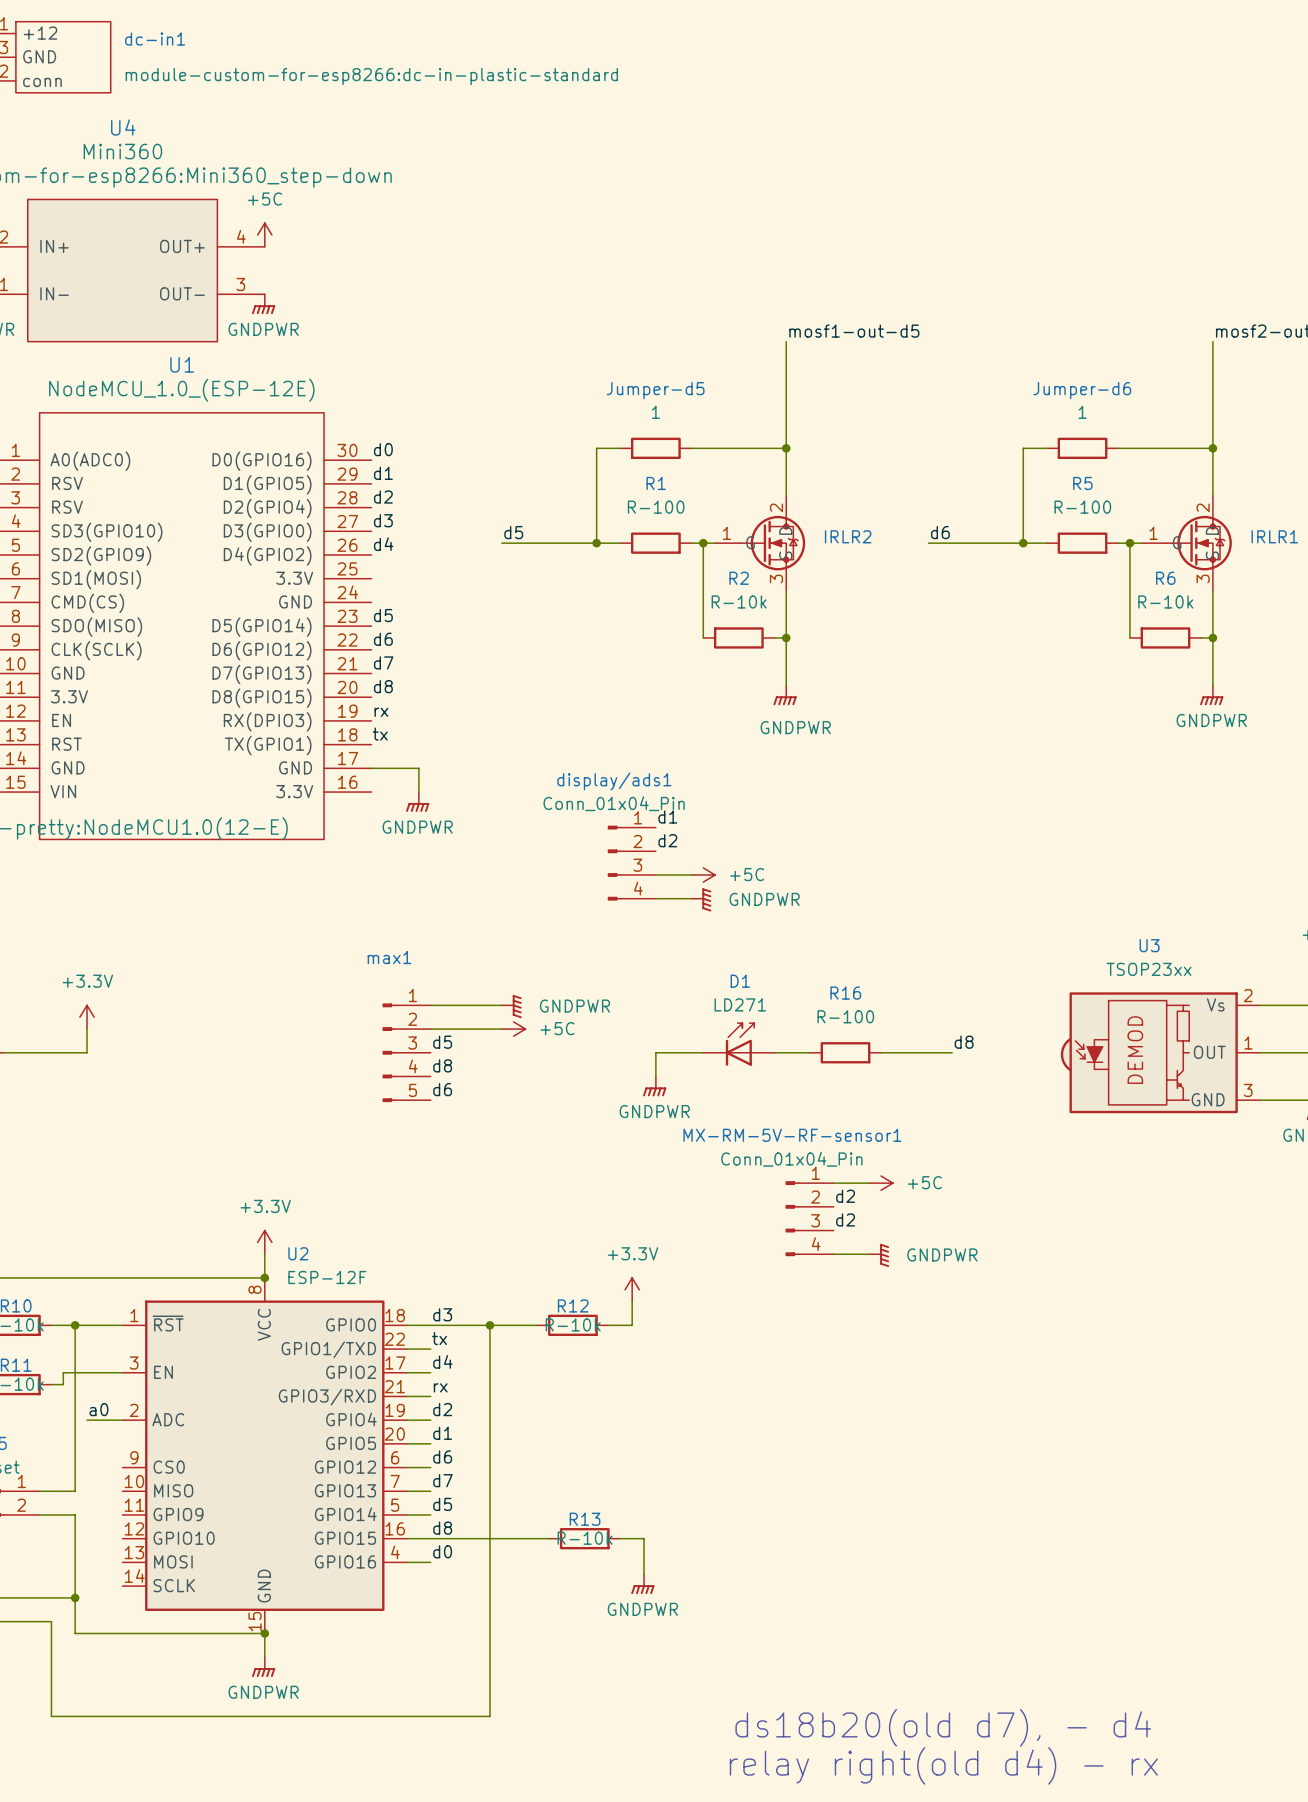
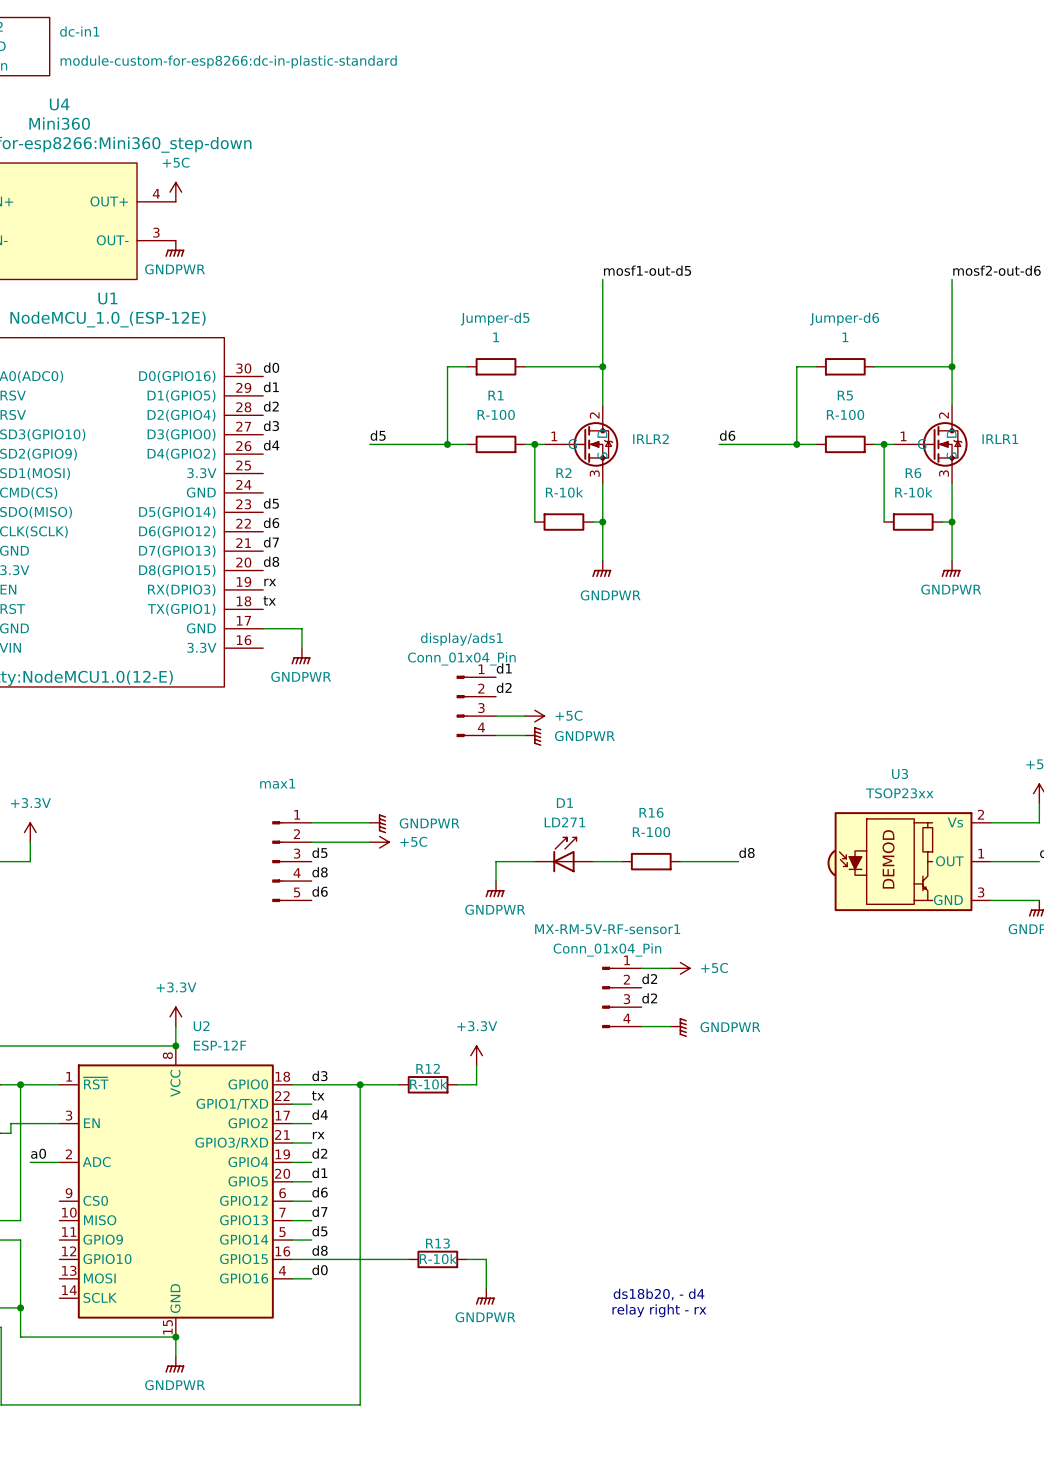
text: none -> ds18b20, - d4 (659, 1294)
text: none -> relay right - rx (659, 1310)
text: ds18b20(old d7), - d4 (943, 1727) -> none
text: relay right(old d4) - rx (943, 1765) -> none

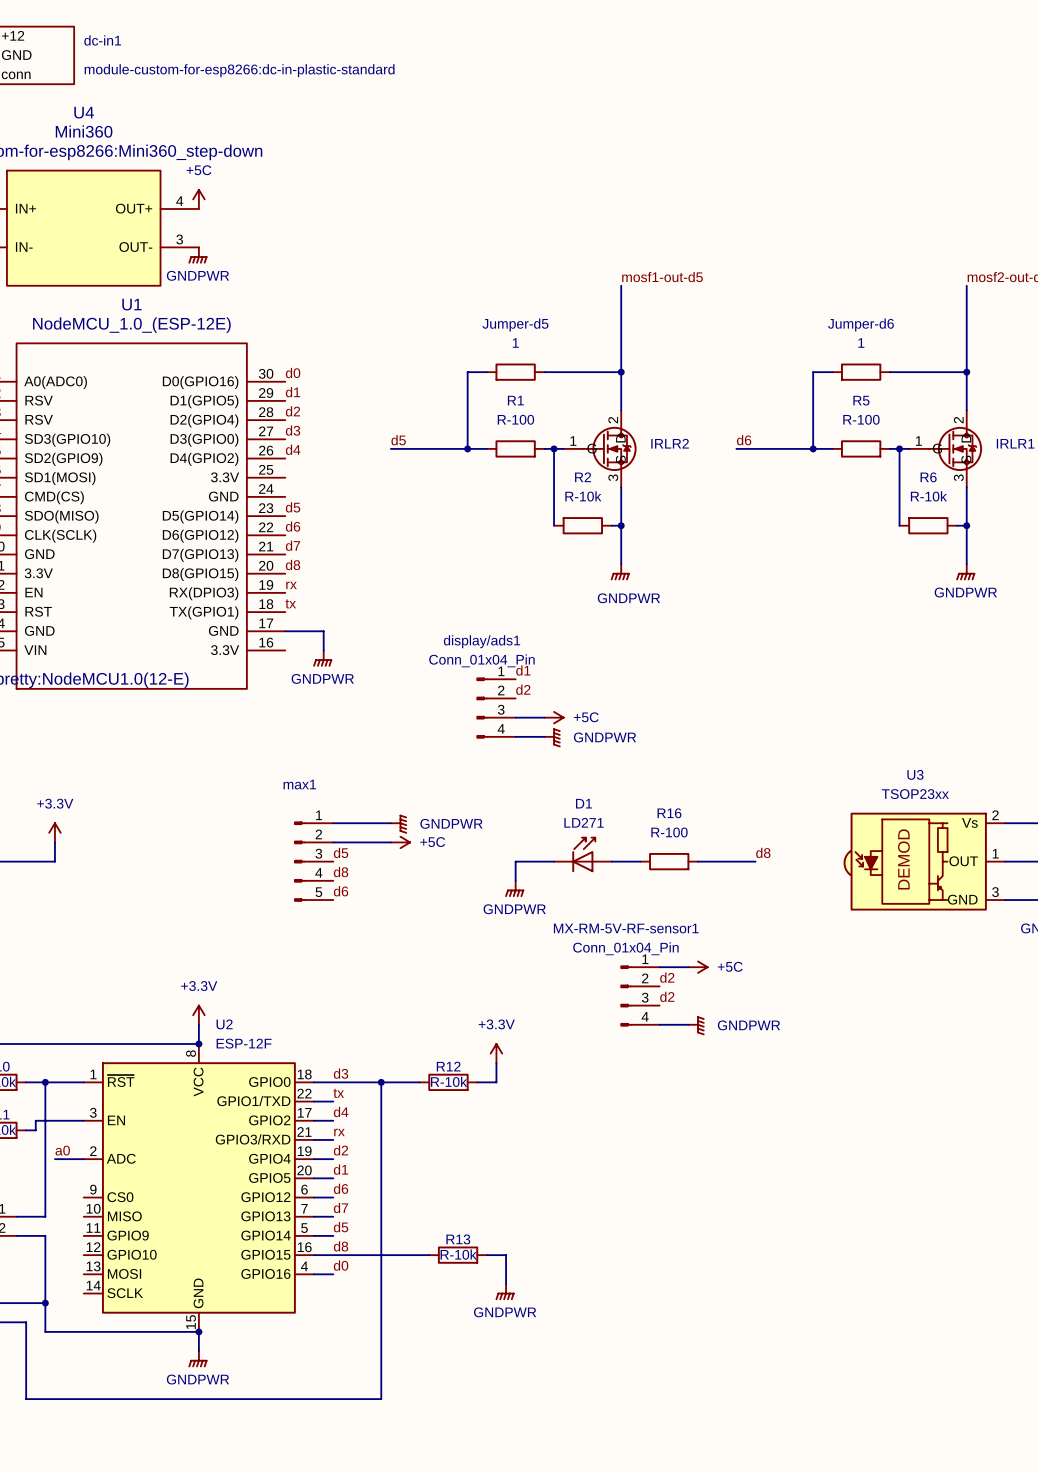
text: ds18b20, - d4 (659, 1294) -> none
text: relay right - rx (659, 1310) -> none

